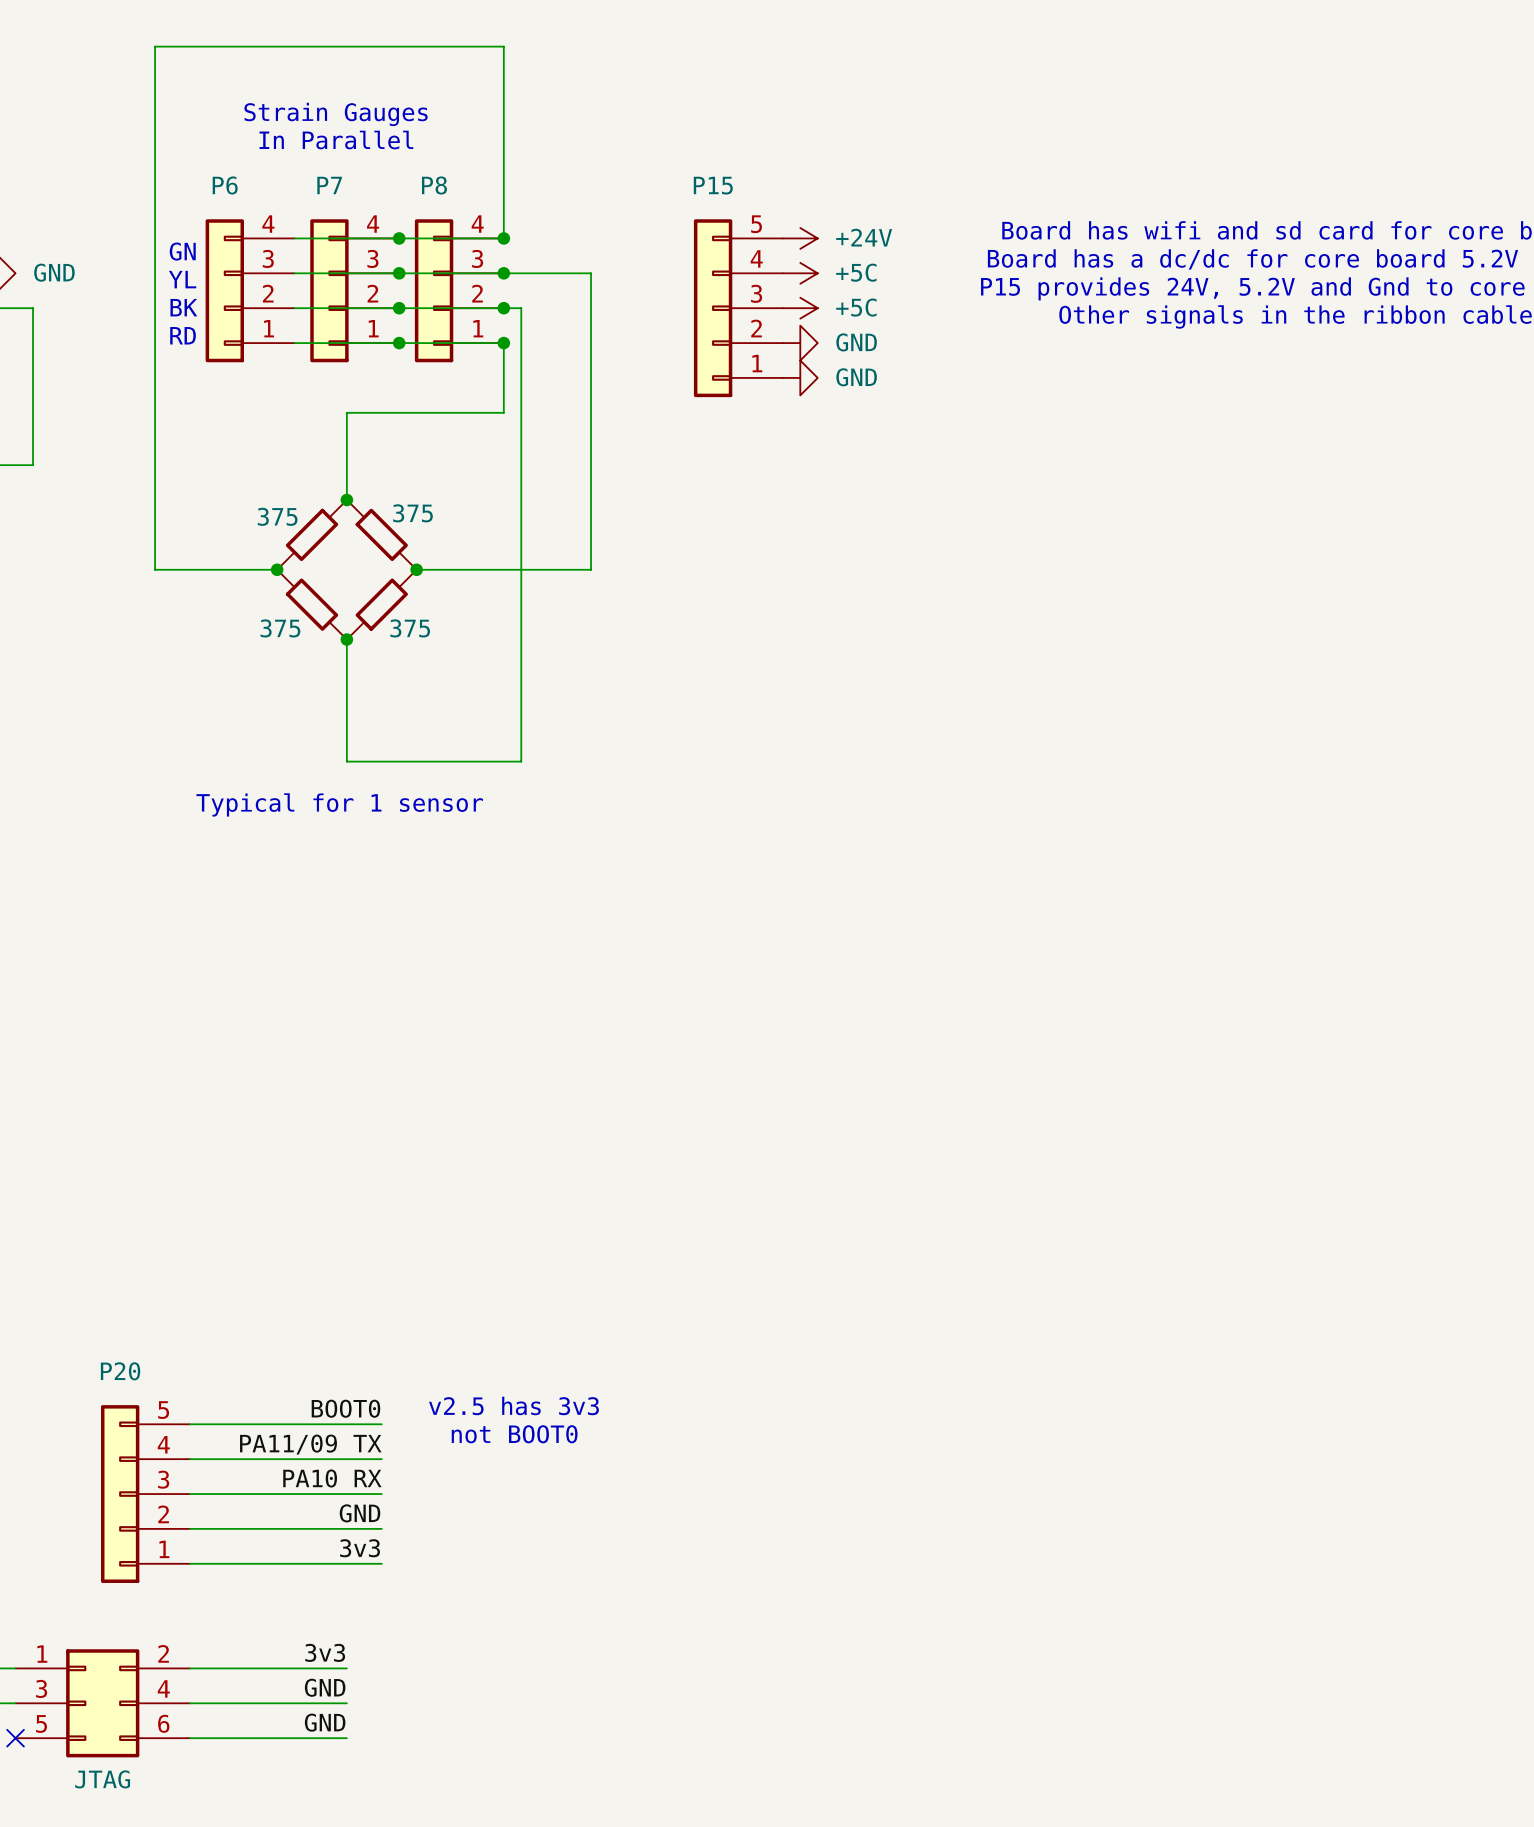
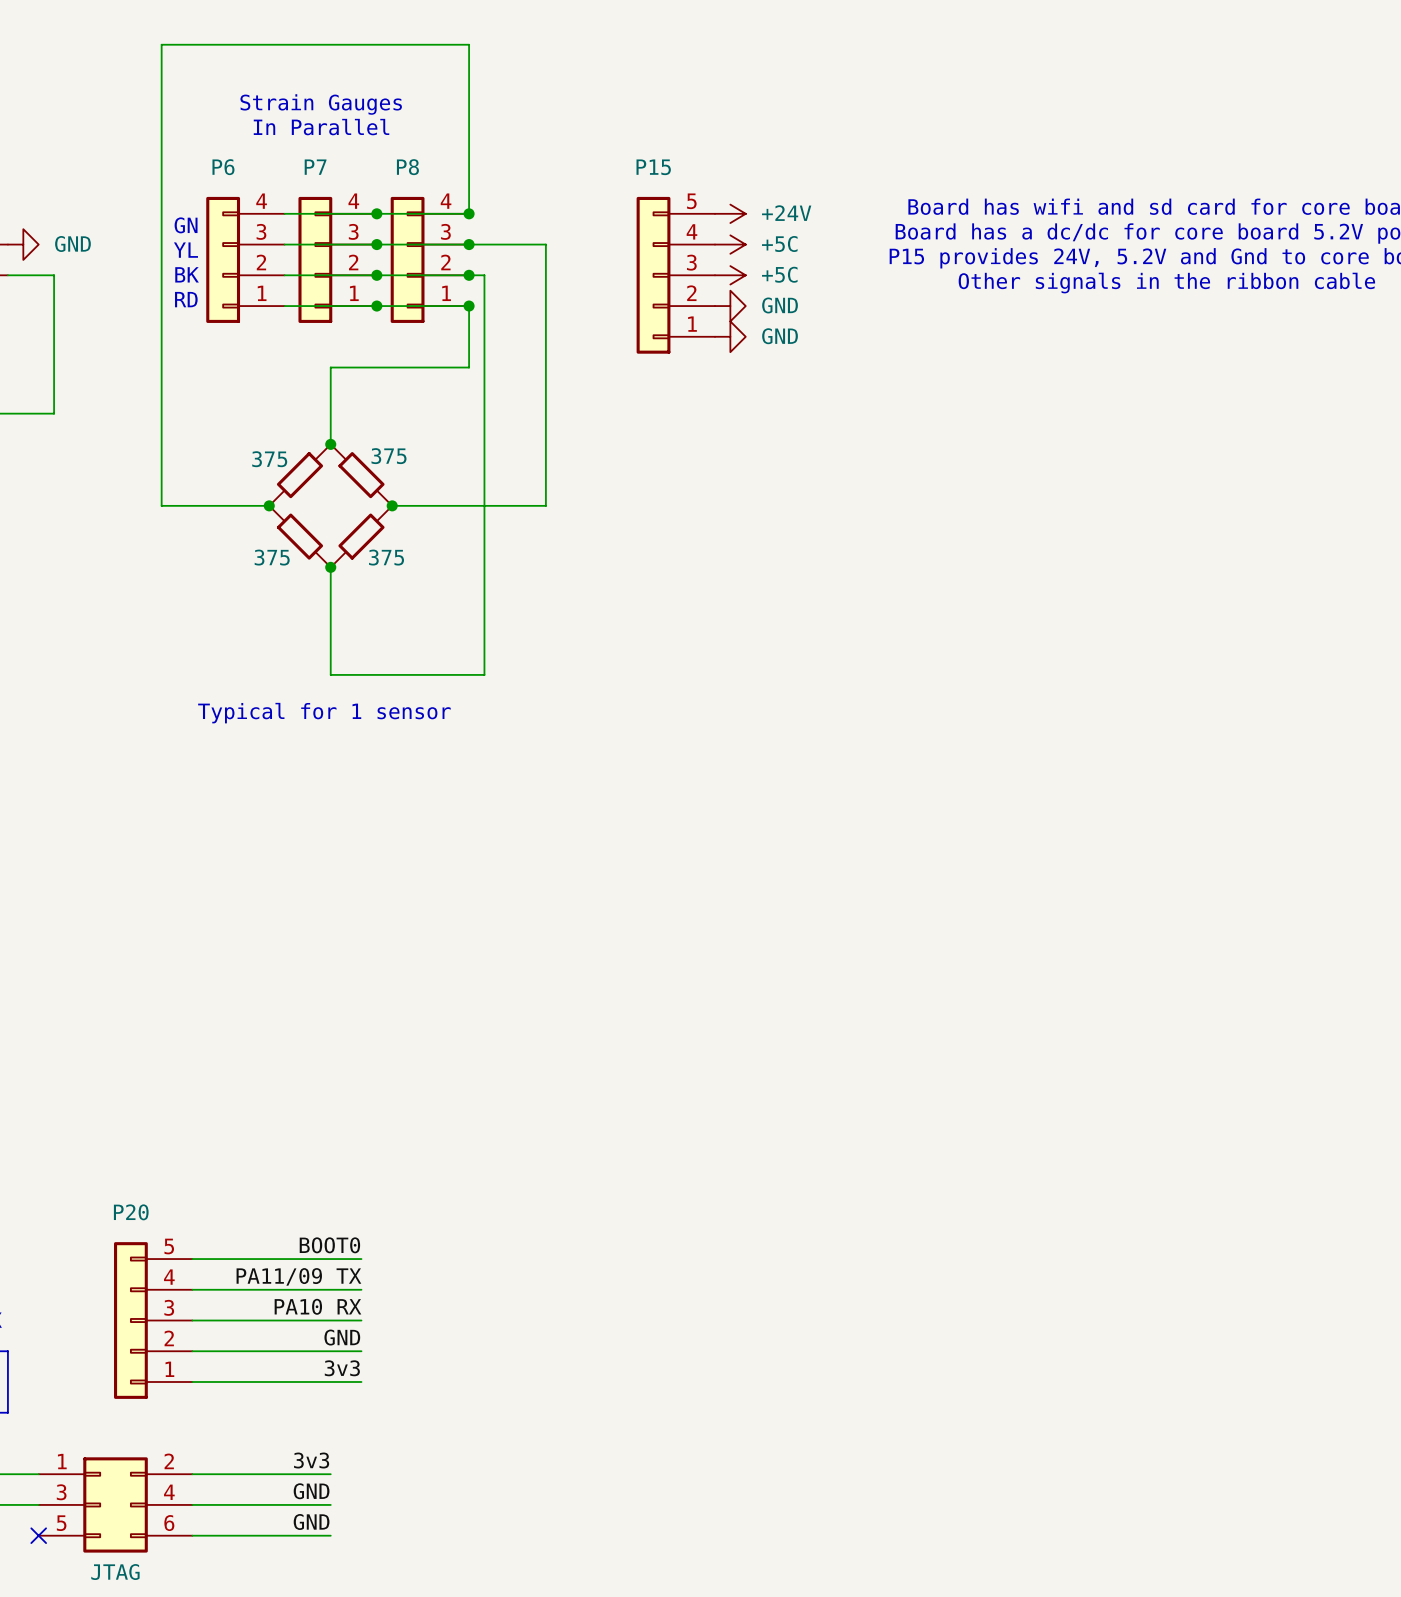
text: v2.5 has 3v3 (513, 1405) -> none
text: not BOOT0 (514, 1434) -> none

